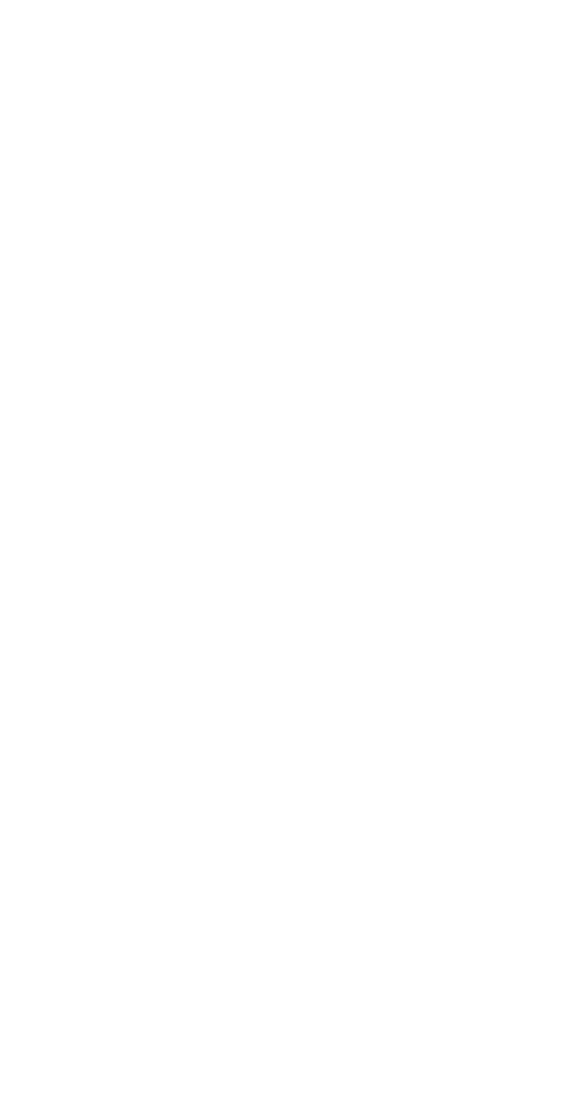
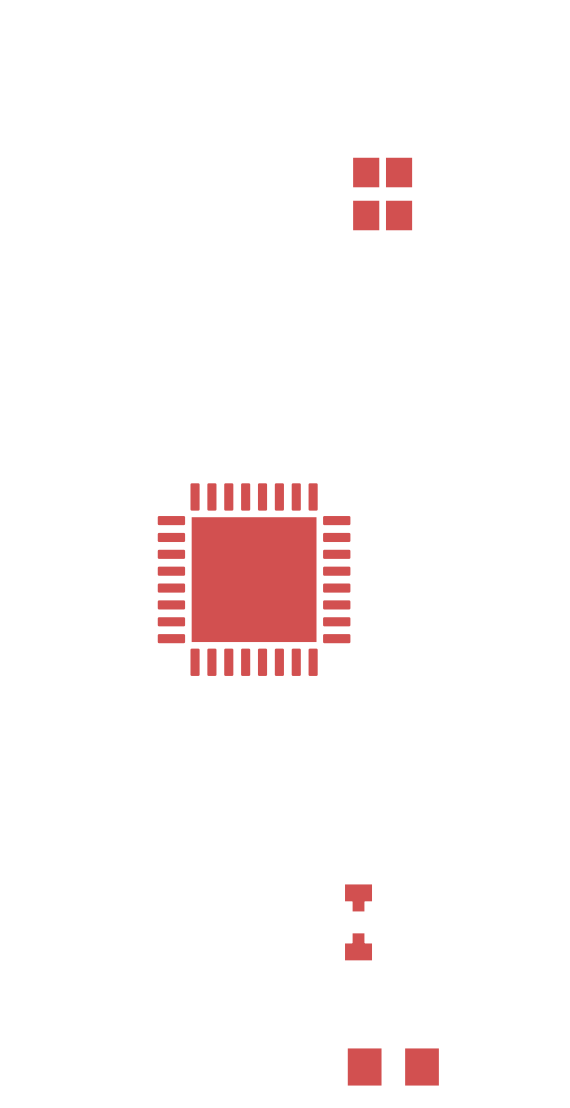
part: none -> (382, 194)
part: none -> (254, 579)
part: none -> (358, 922)
part: none -> (393, 1067)

